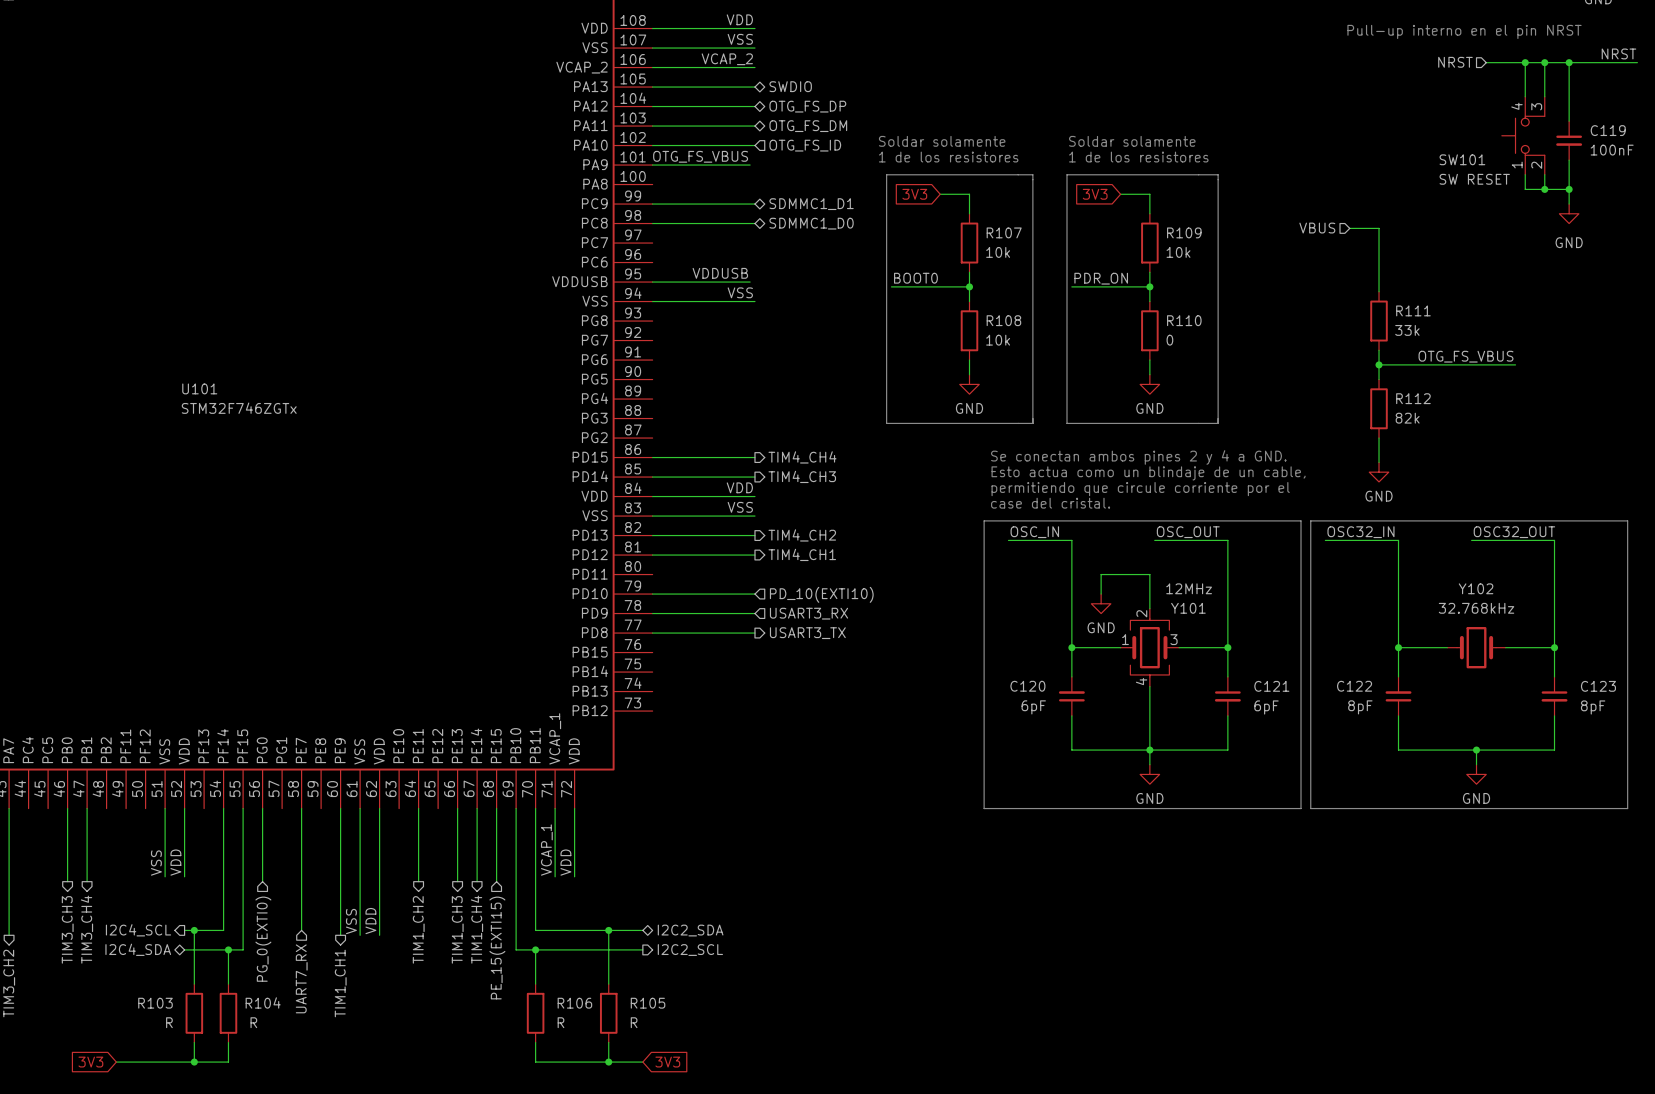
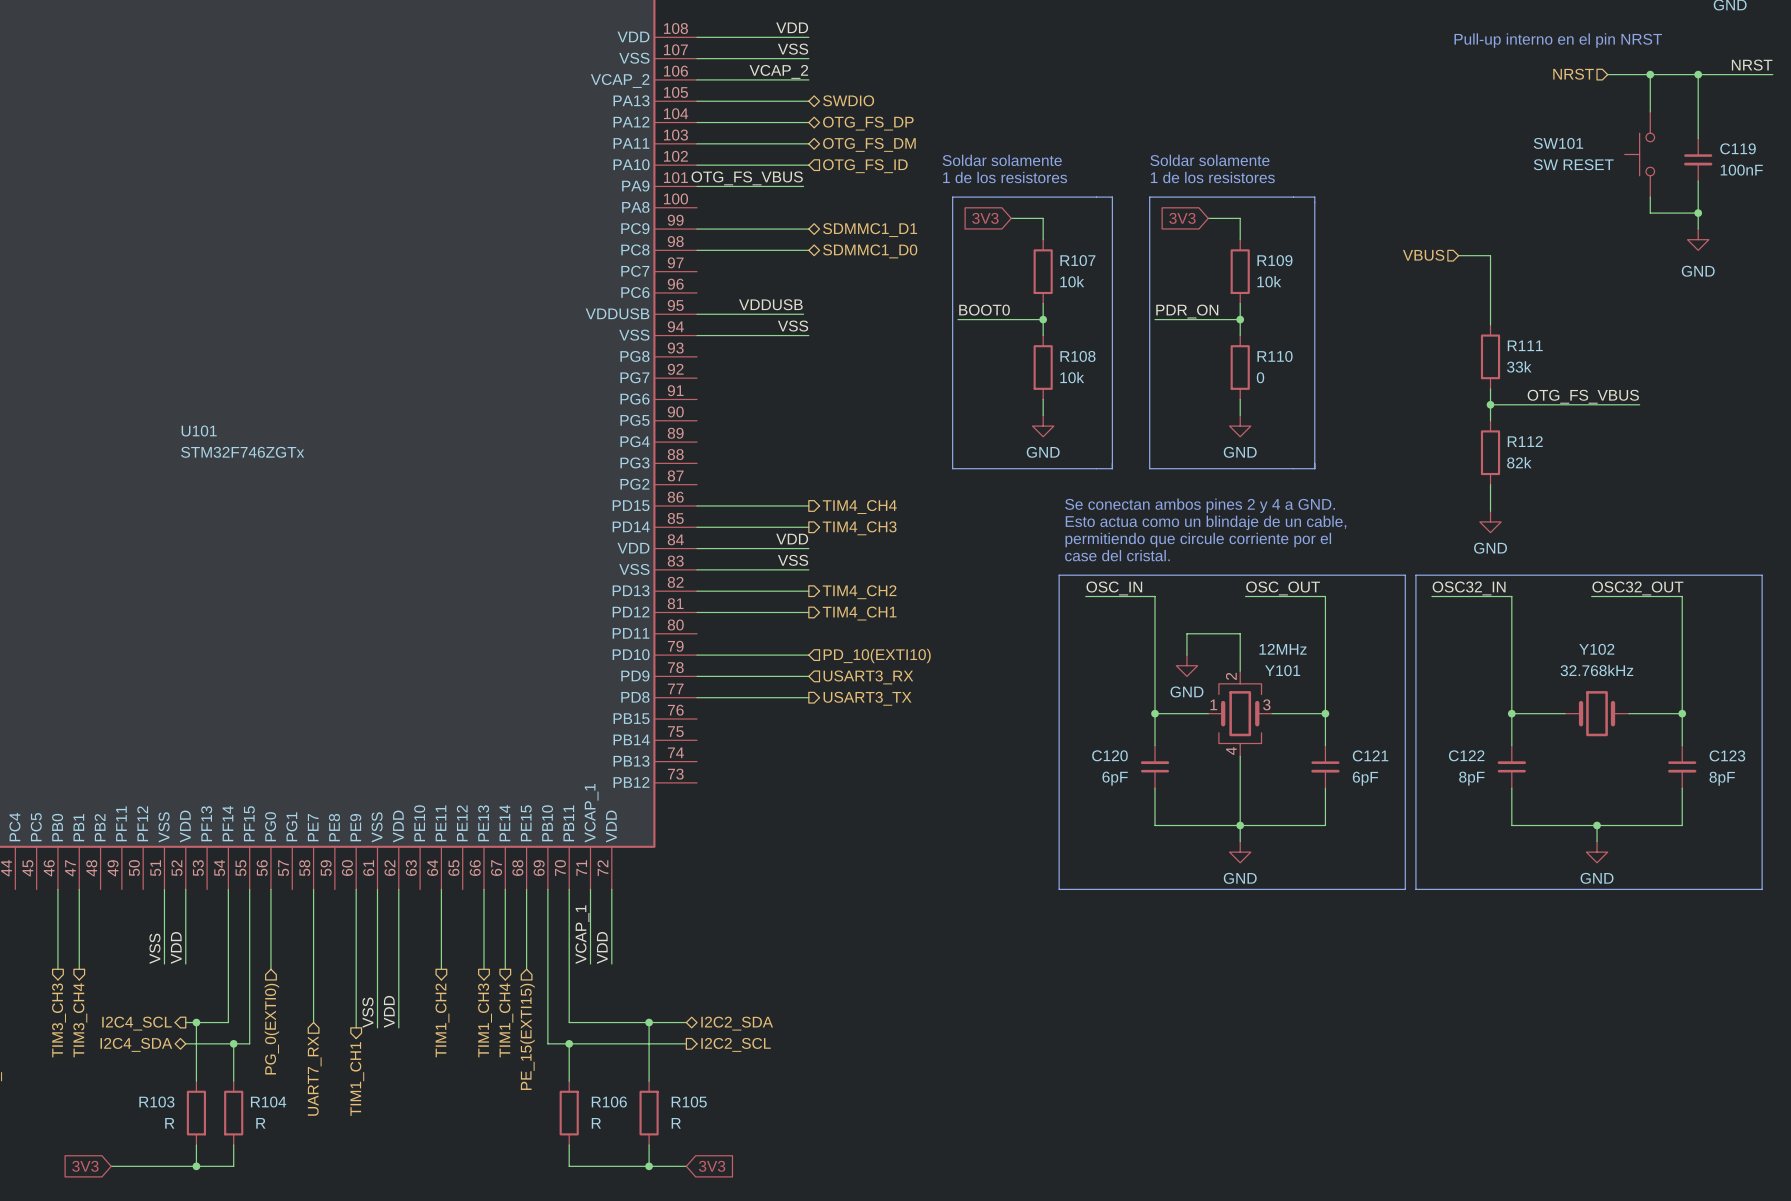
wire: (1544, 62) (1544, 96) -> none
junction: (1544, 62) -> none
SW101 symbol: [1501, 96, 1545, 175] -> [1624, 111, 1655, 198]
SW101 name position: SW101 (1462, 159) -> SW101 (1558, 143)
wire: (1544, 174) (1544, 189) -> none
SW101 value position: SW RESET (1474, 179) -> SW RESET (1573, 164)
junction: (1544, 189) -> none

